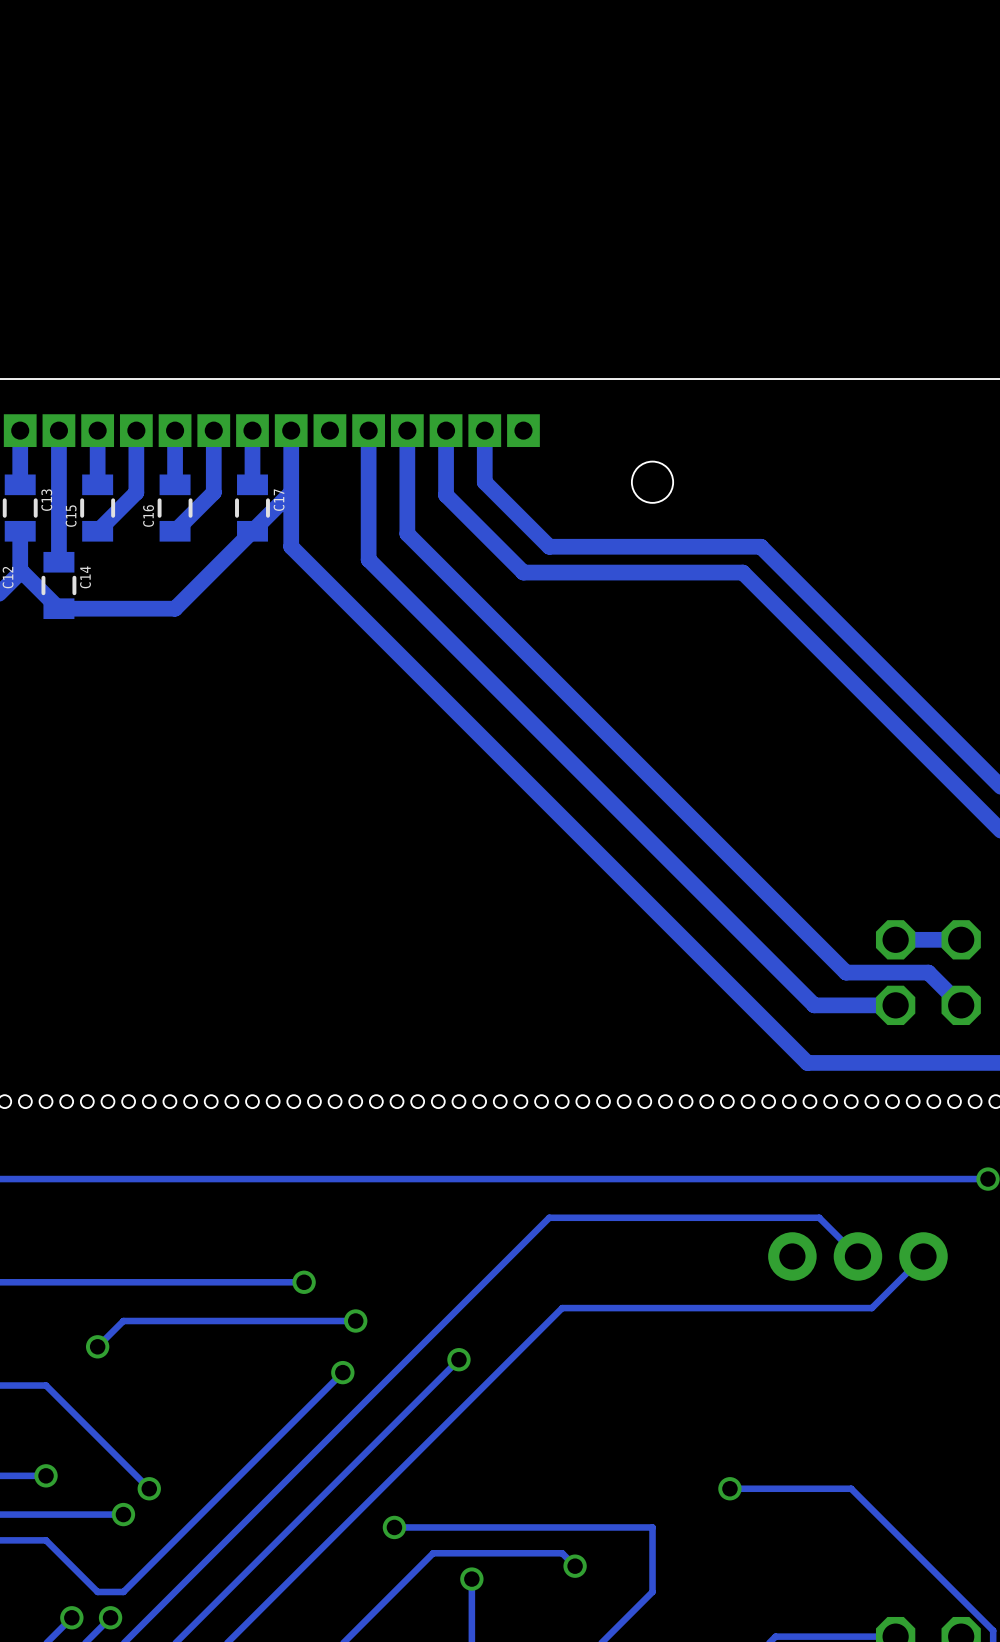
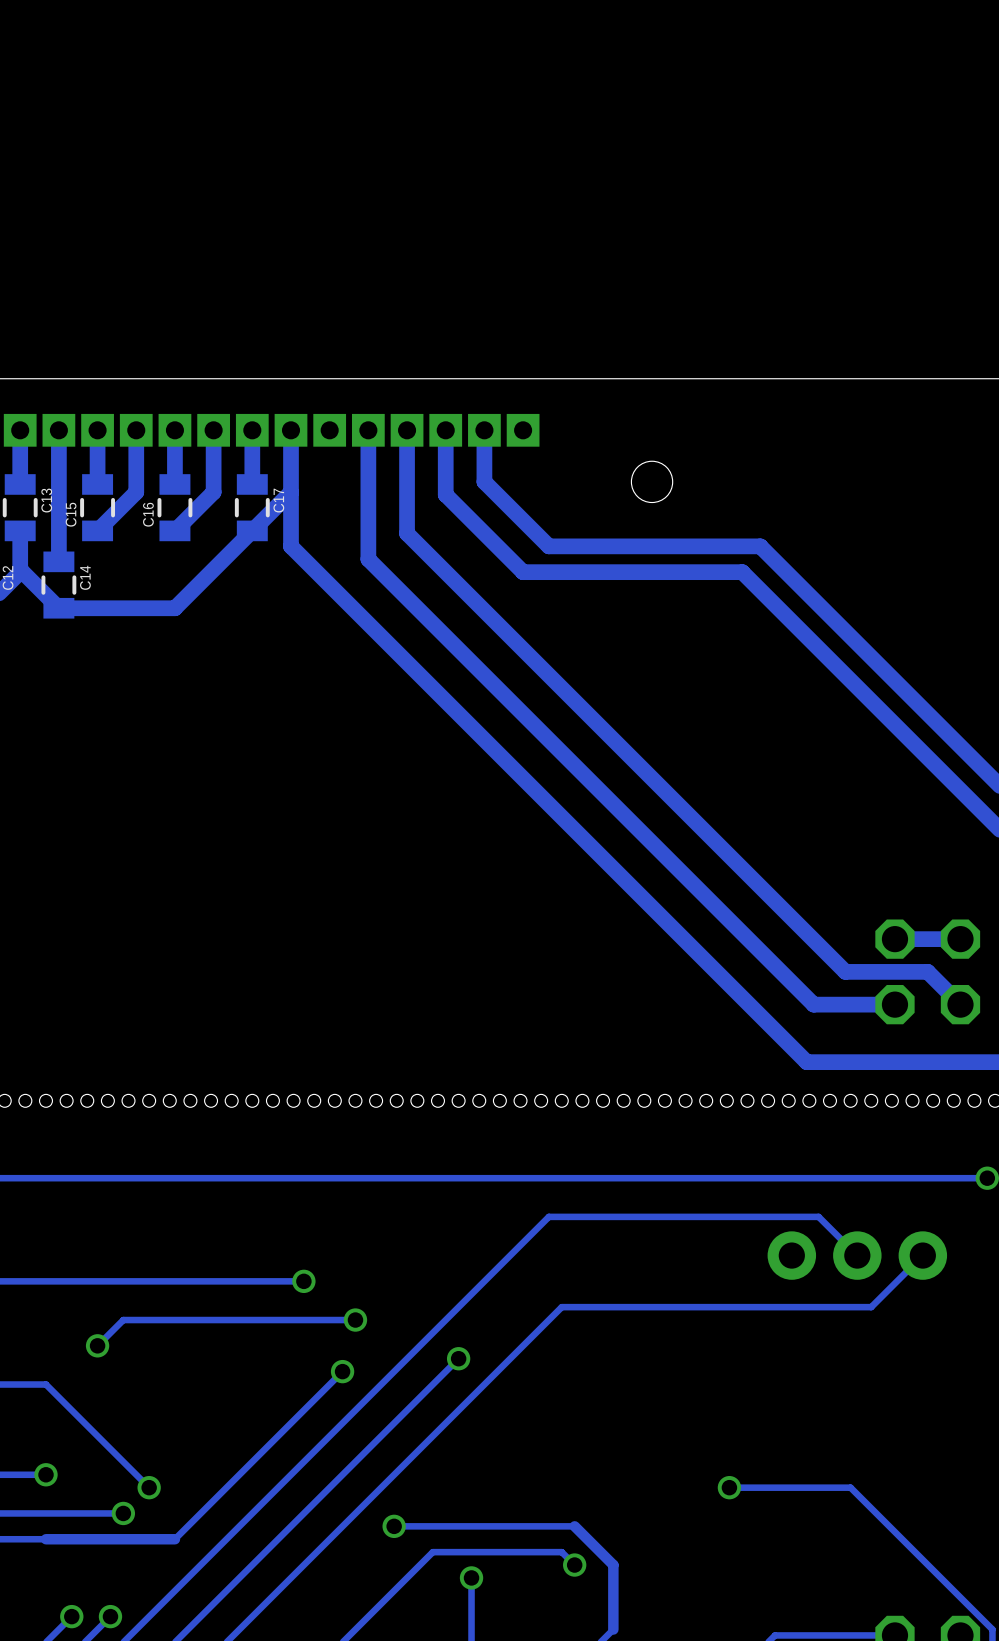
track: (575, 1527) (652, 1527) (652, 1591) (613, 1630) -> (574, 1526) (613, 1565) (613, 1629)
track: (175, 1540) (123, 1591) (97, 1591) (46, 1540) -> (174, 1539) (46, 1539)

